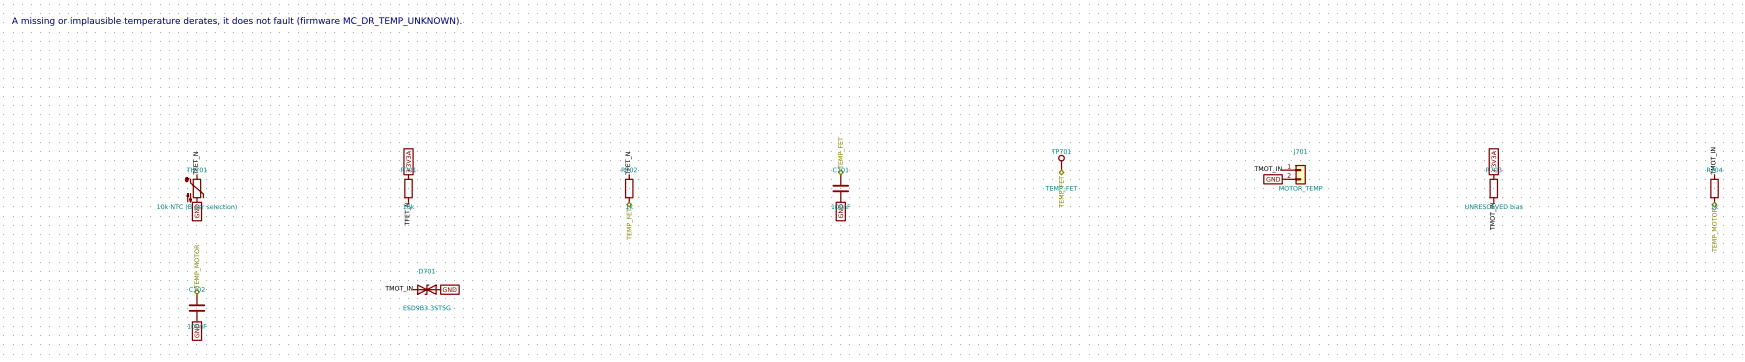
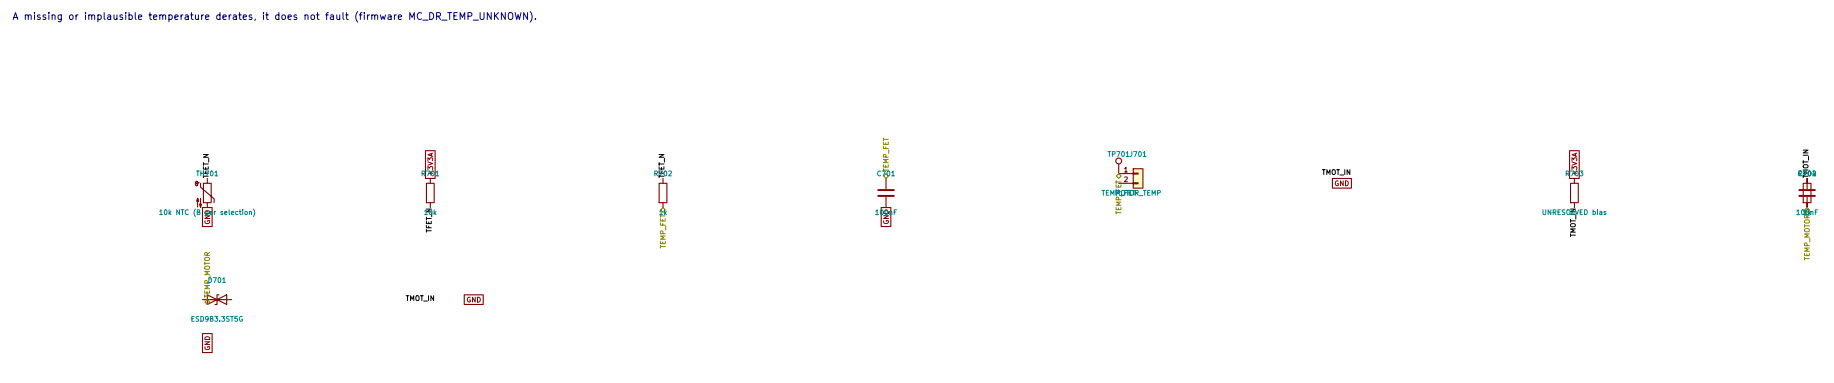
part position: (1293, 174) -> (1131, 178)
part position: (426, 289) -> (217, 299)
part position: (196, 308) -> (1807, 192)

